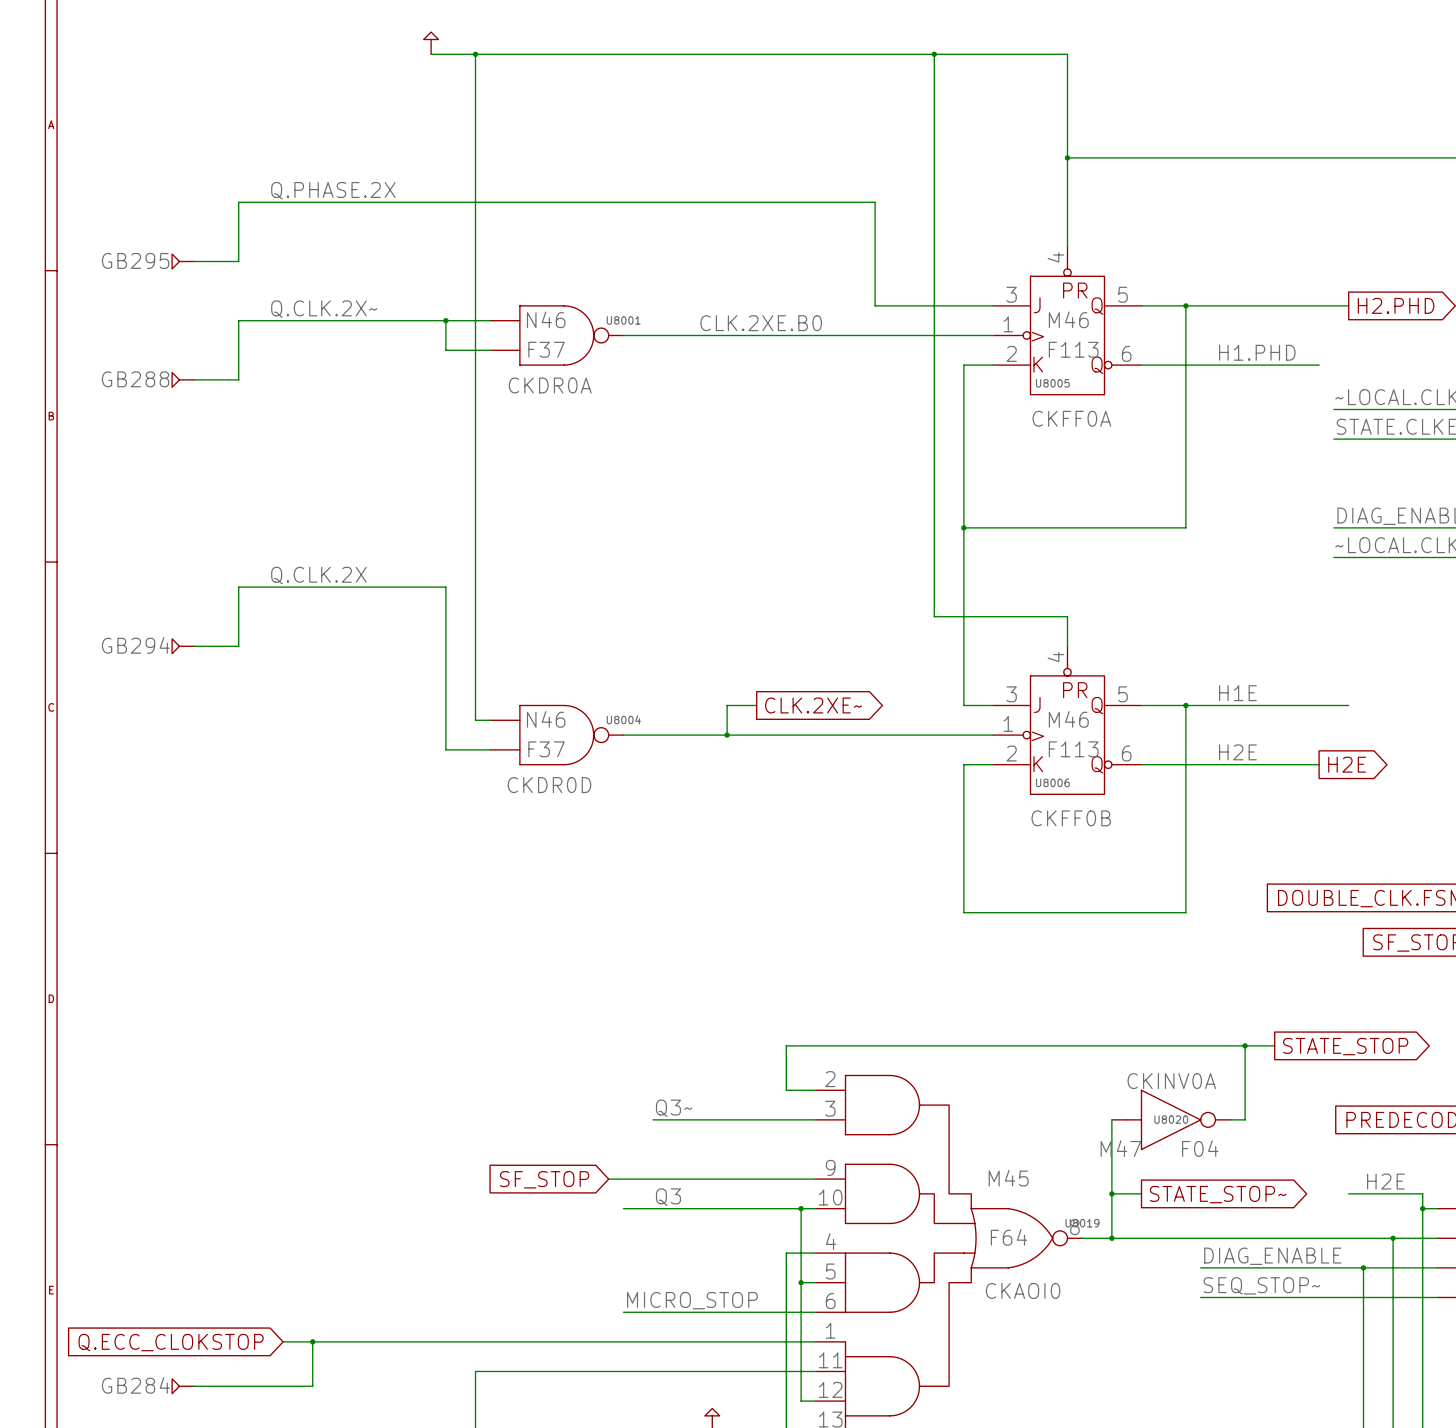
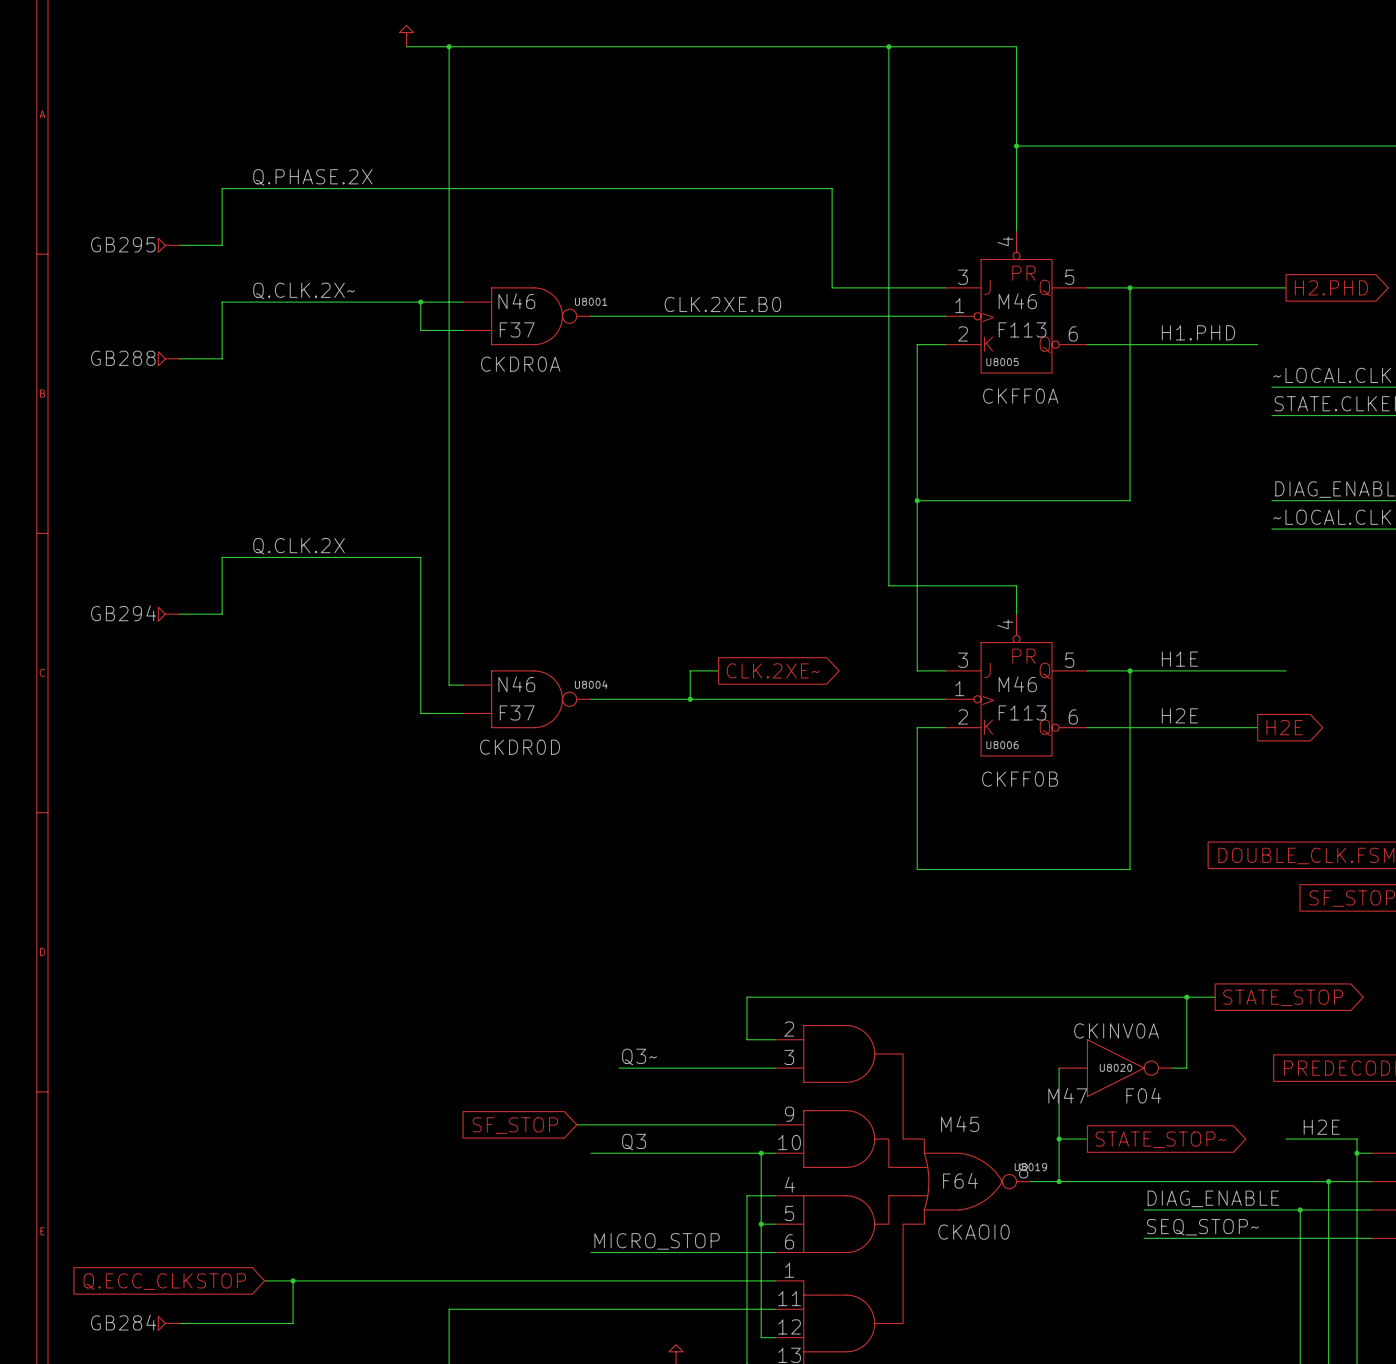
global label: Q.ECC_CLOKSTOP (171, 1342) -> Q.ECC_CLKSTOP (164, 1281)

